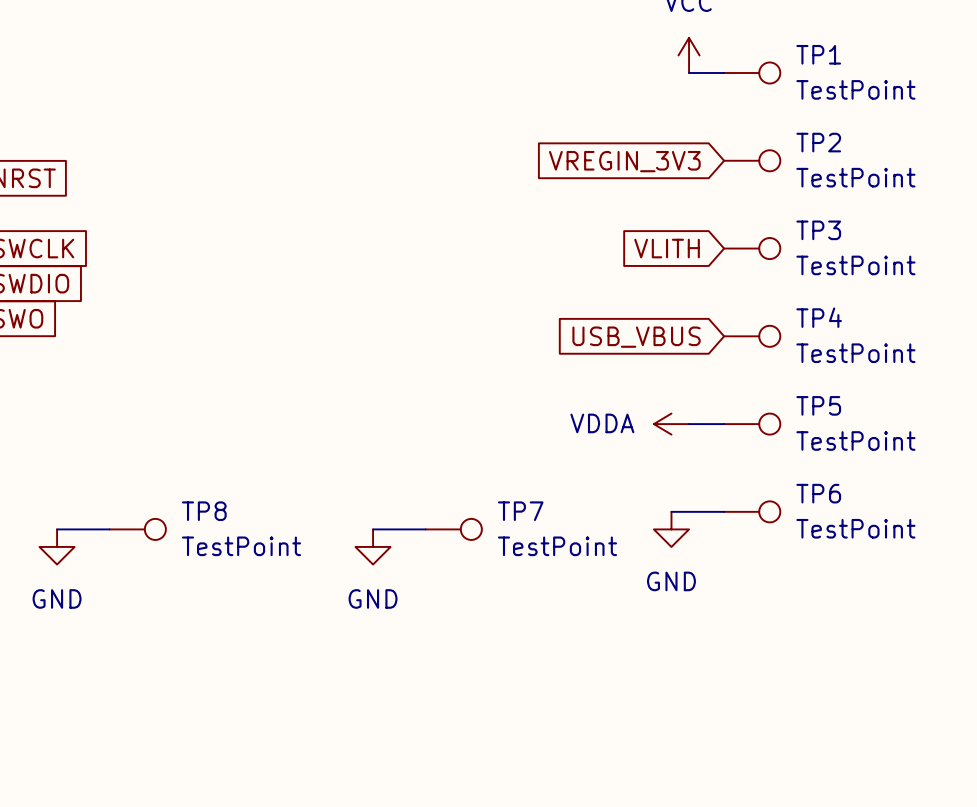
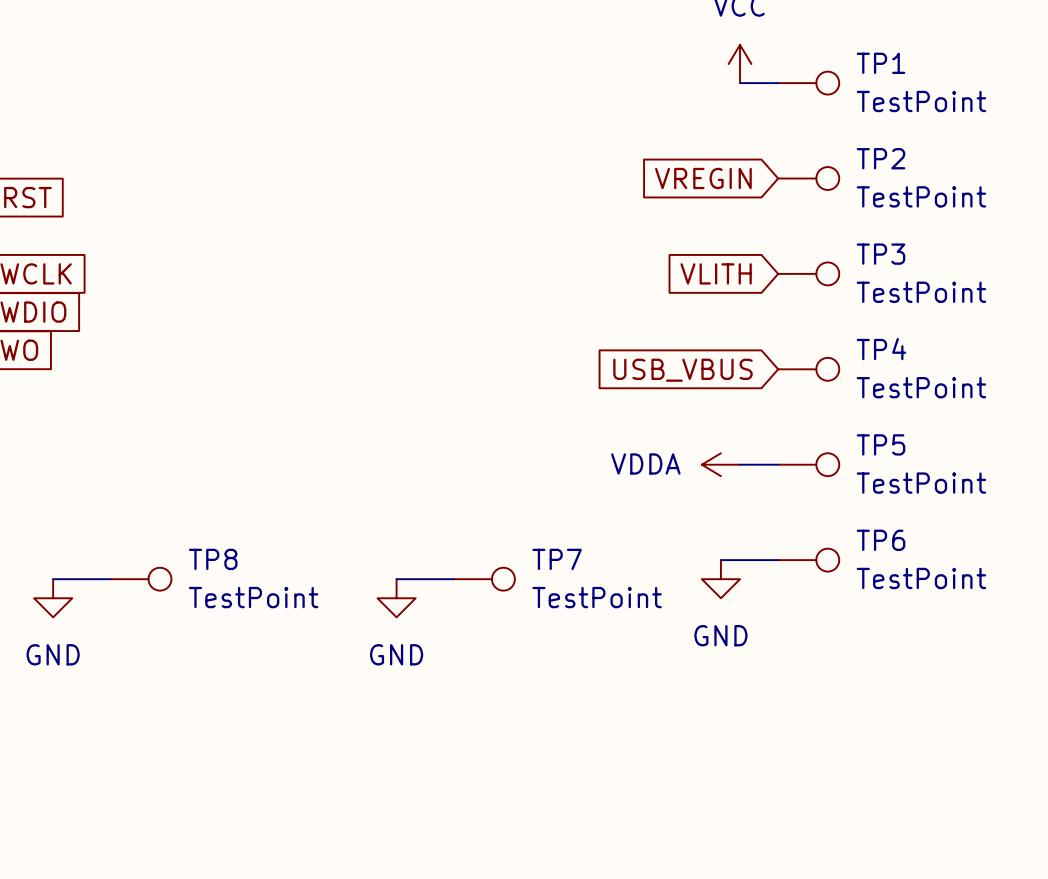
global label: VREGIN_3V3 (624, 161) -> VREGIN (703, 178)

